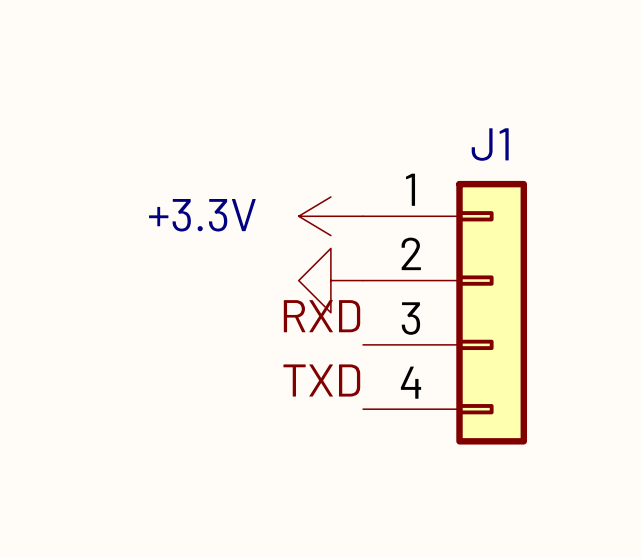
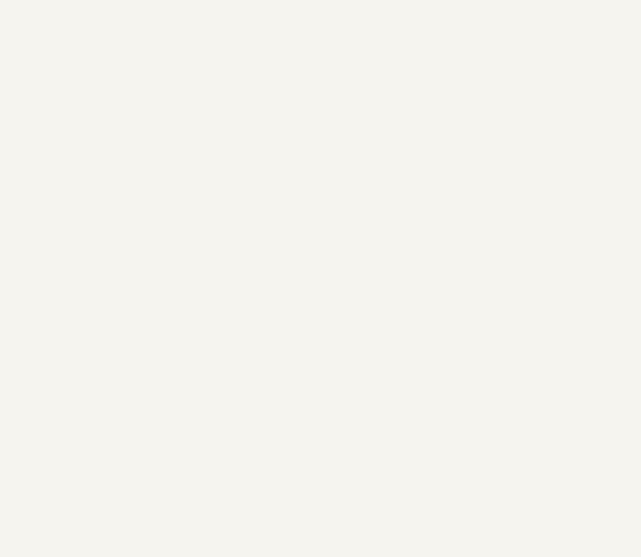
power symbol: +3.3V (330, 216) -> none
power symbol: (330, 280) -> none
J1: (445, 312) -> none
label: RXD (322, 316) -> none
label: TXD (321, 380) -> none

